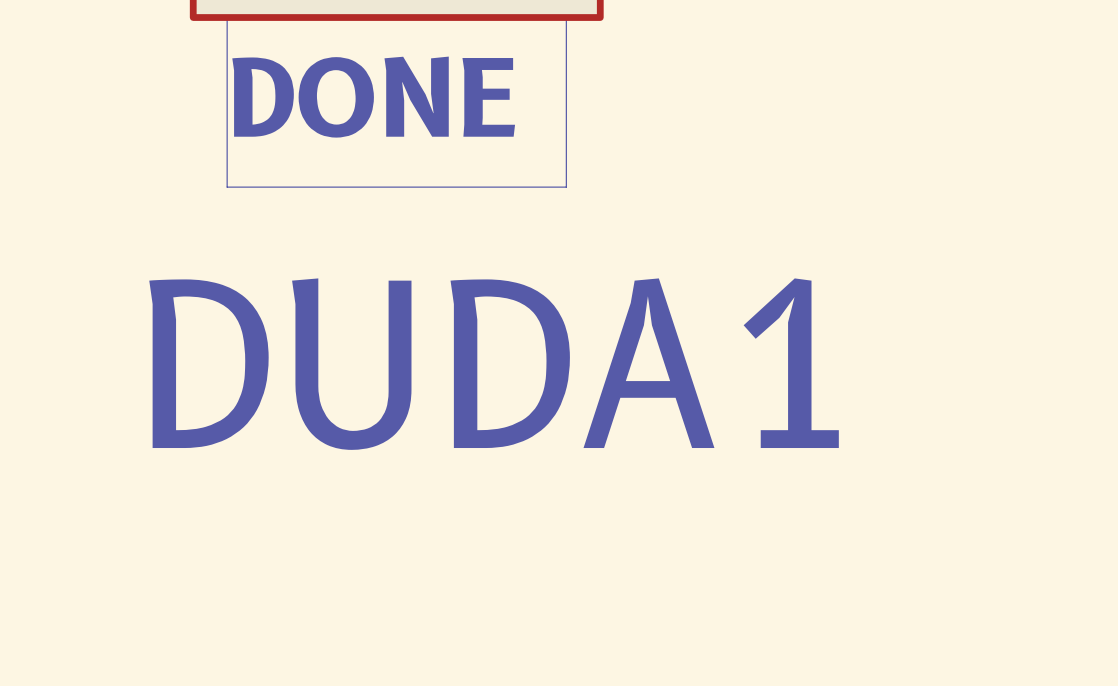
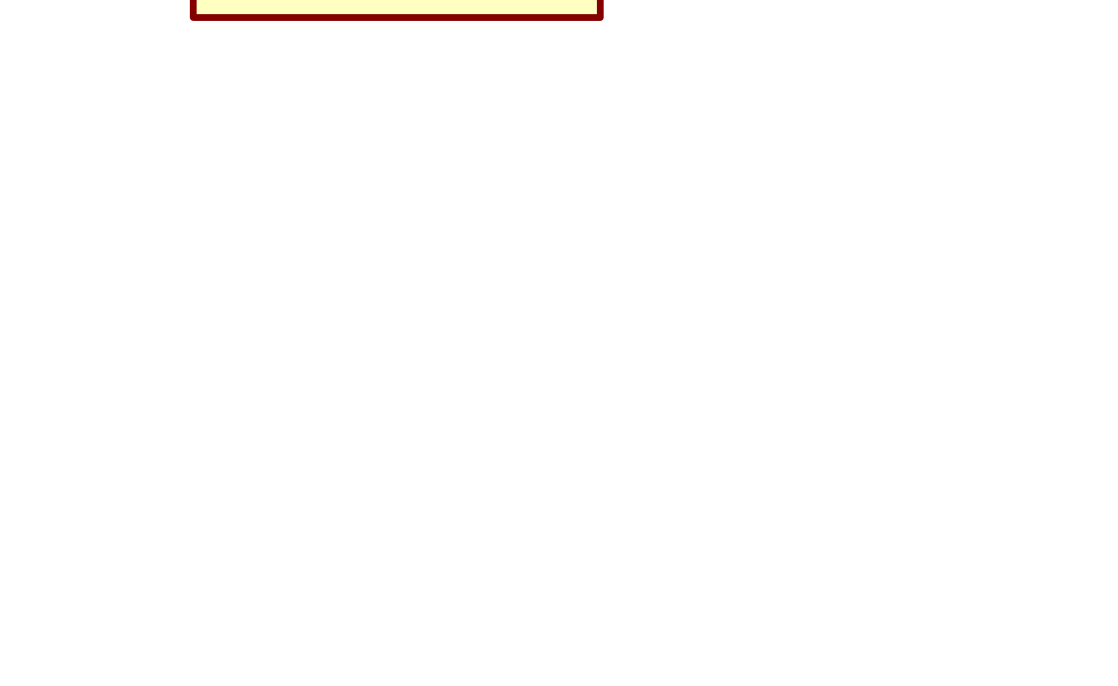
line: (227, 17) (566, 17) (566, 187) (227, 187) (227, 17) -> none
text: DONE (373, 97) -> none
text: DUDA1 (494, 364) -> none

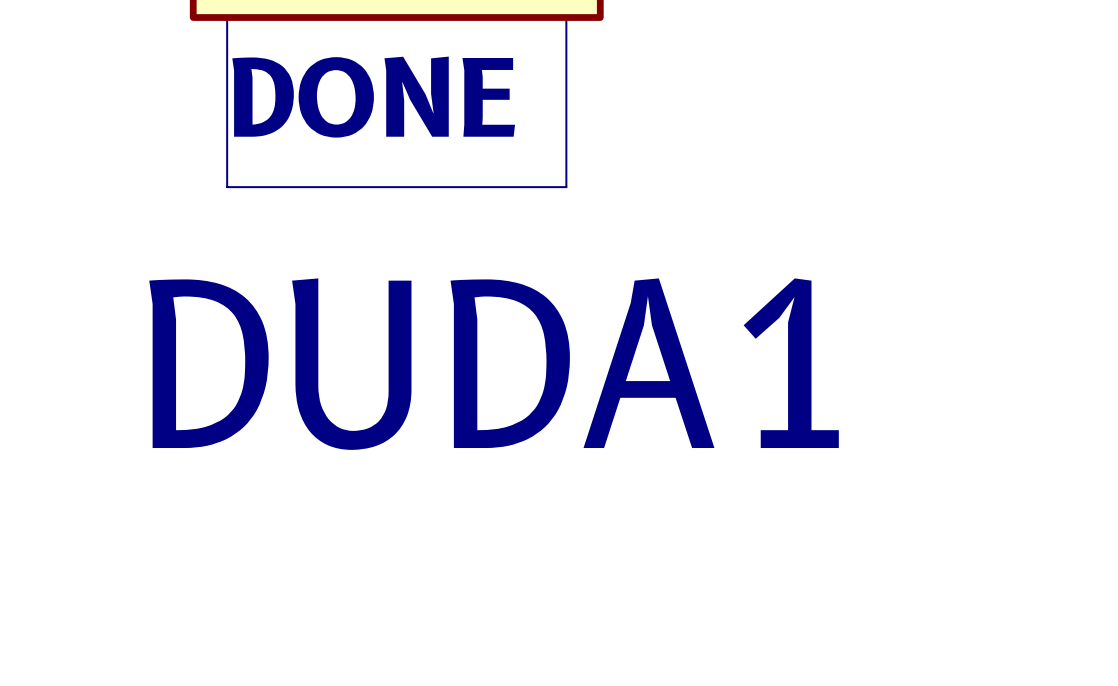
line: none -> (227, 17) (566, 17) (566, 187) (227, 187) (227, 17)
text: none -> DONE (373, 97)
text: none -> DUDA1 (494, 364)

